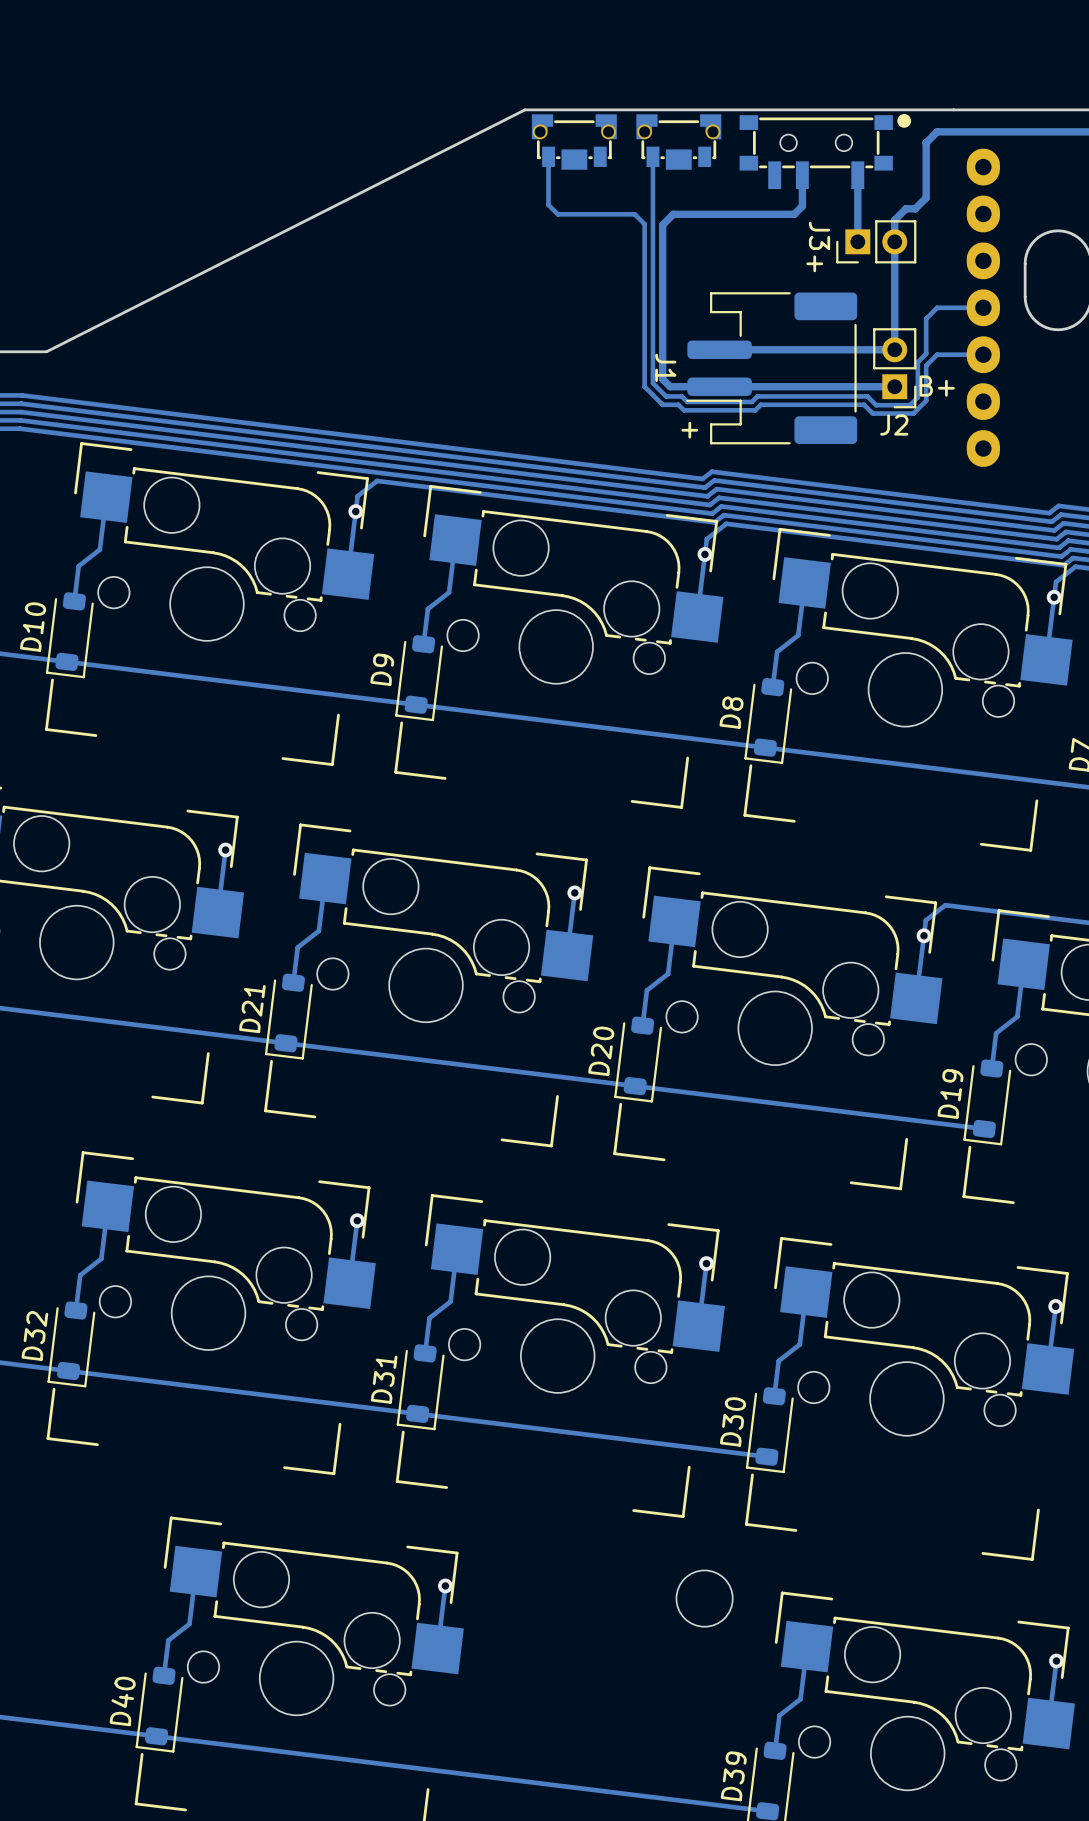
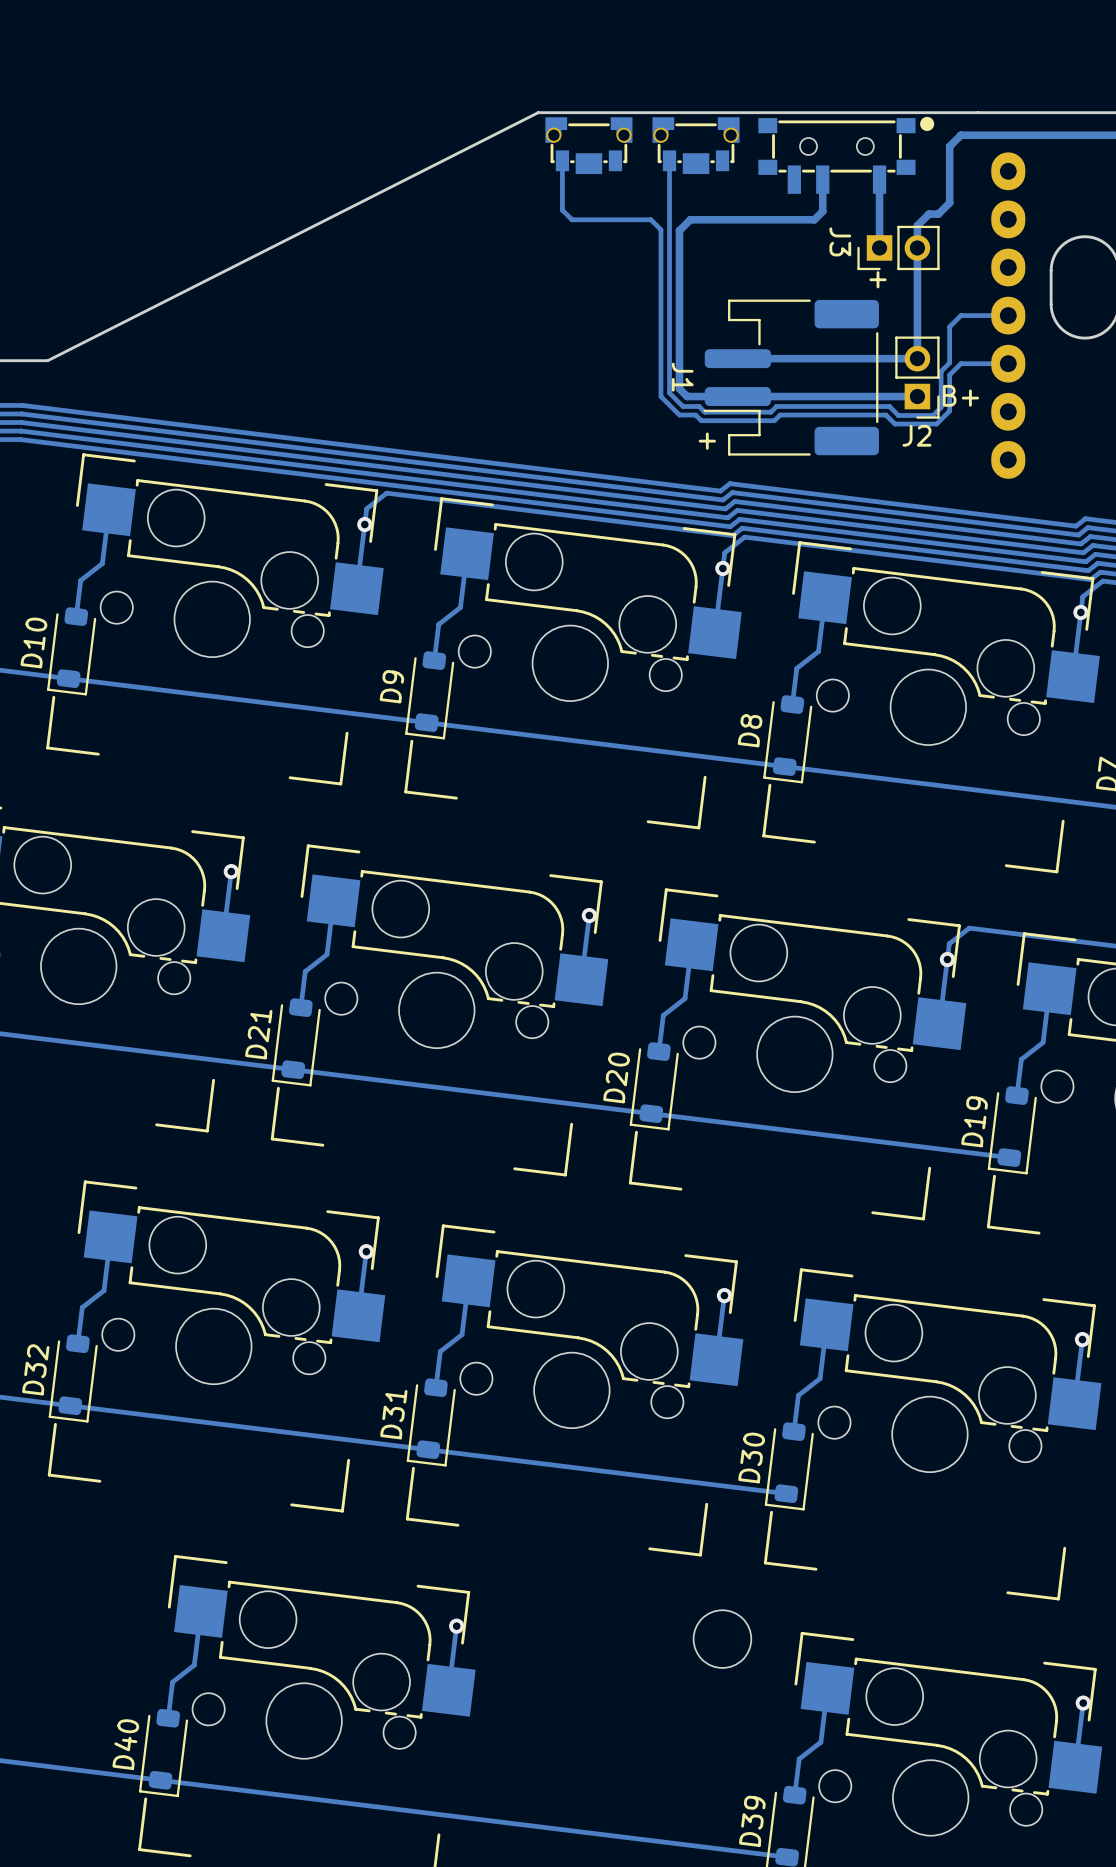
text position: + (814, 263) -> + (878, 279)

